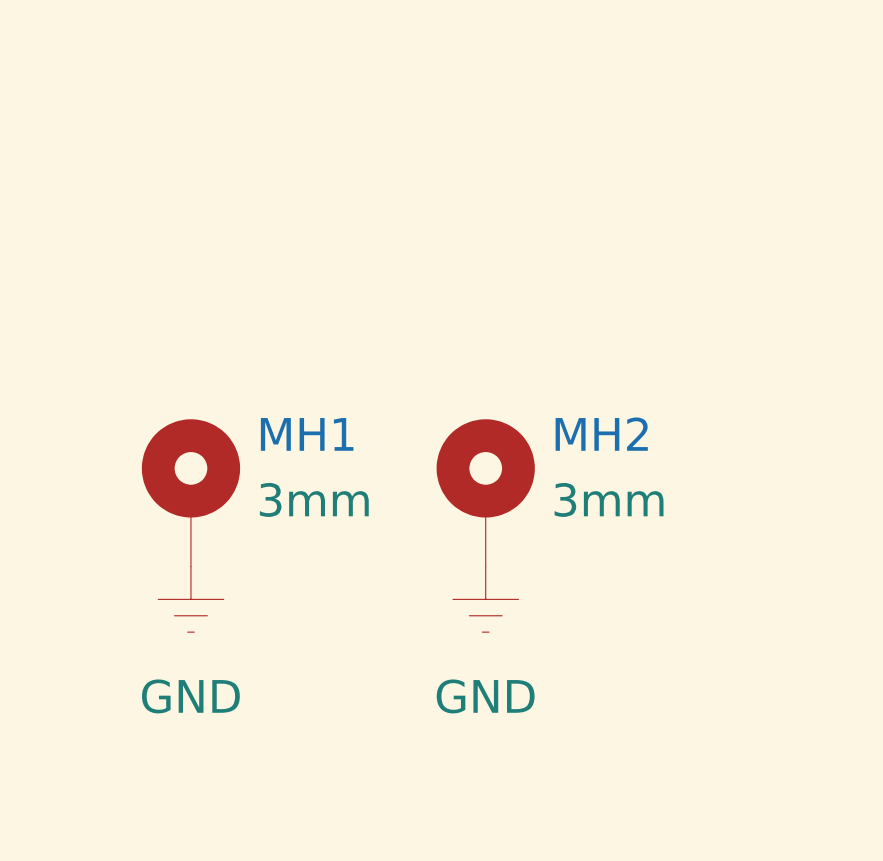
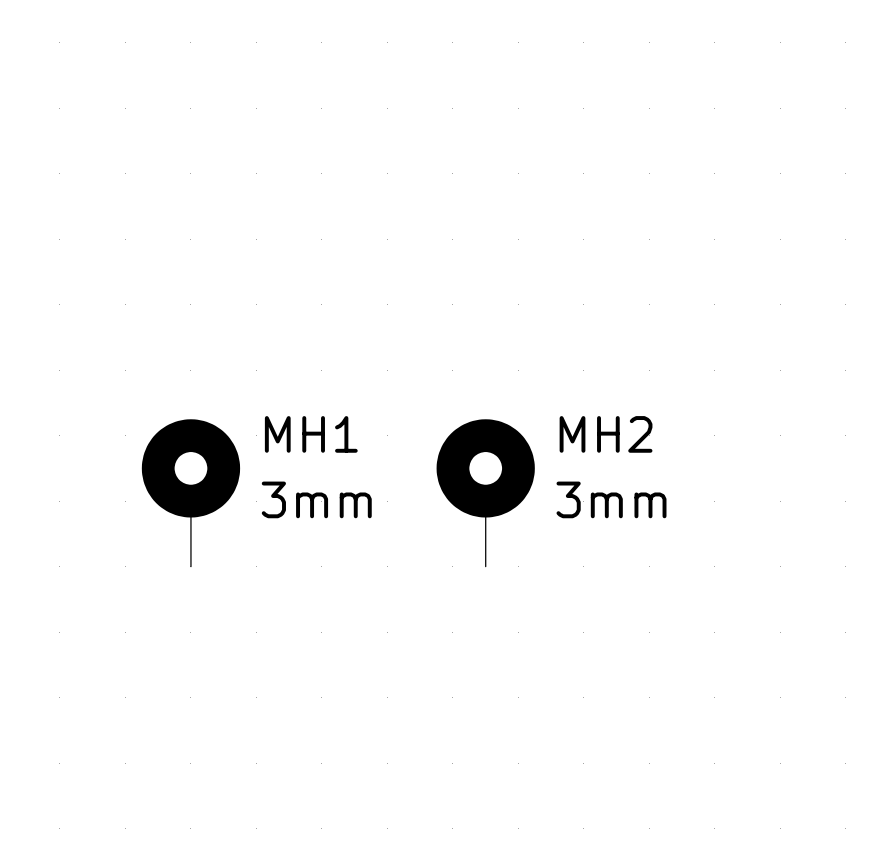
power symbol: GND (190, 599) -> none
power symbol: GND (485, 599) -> none

